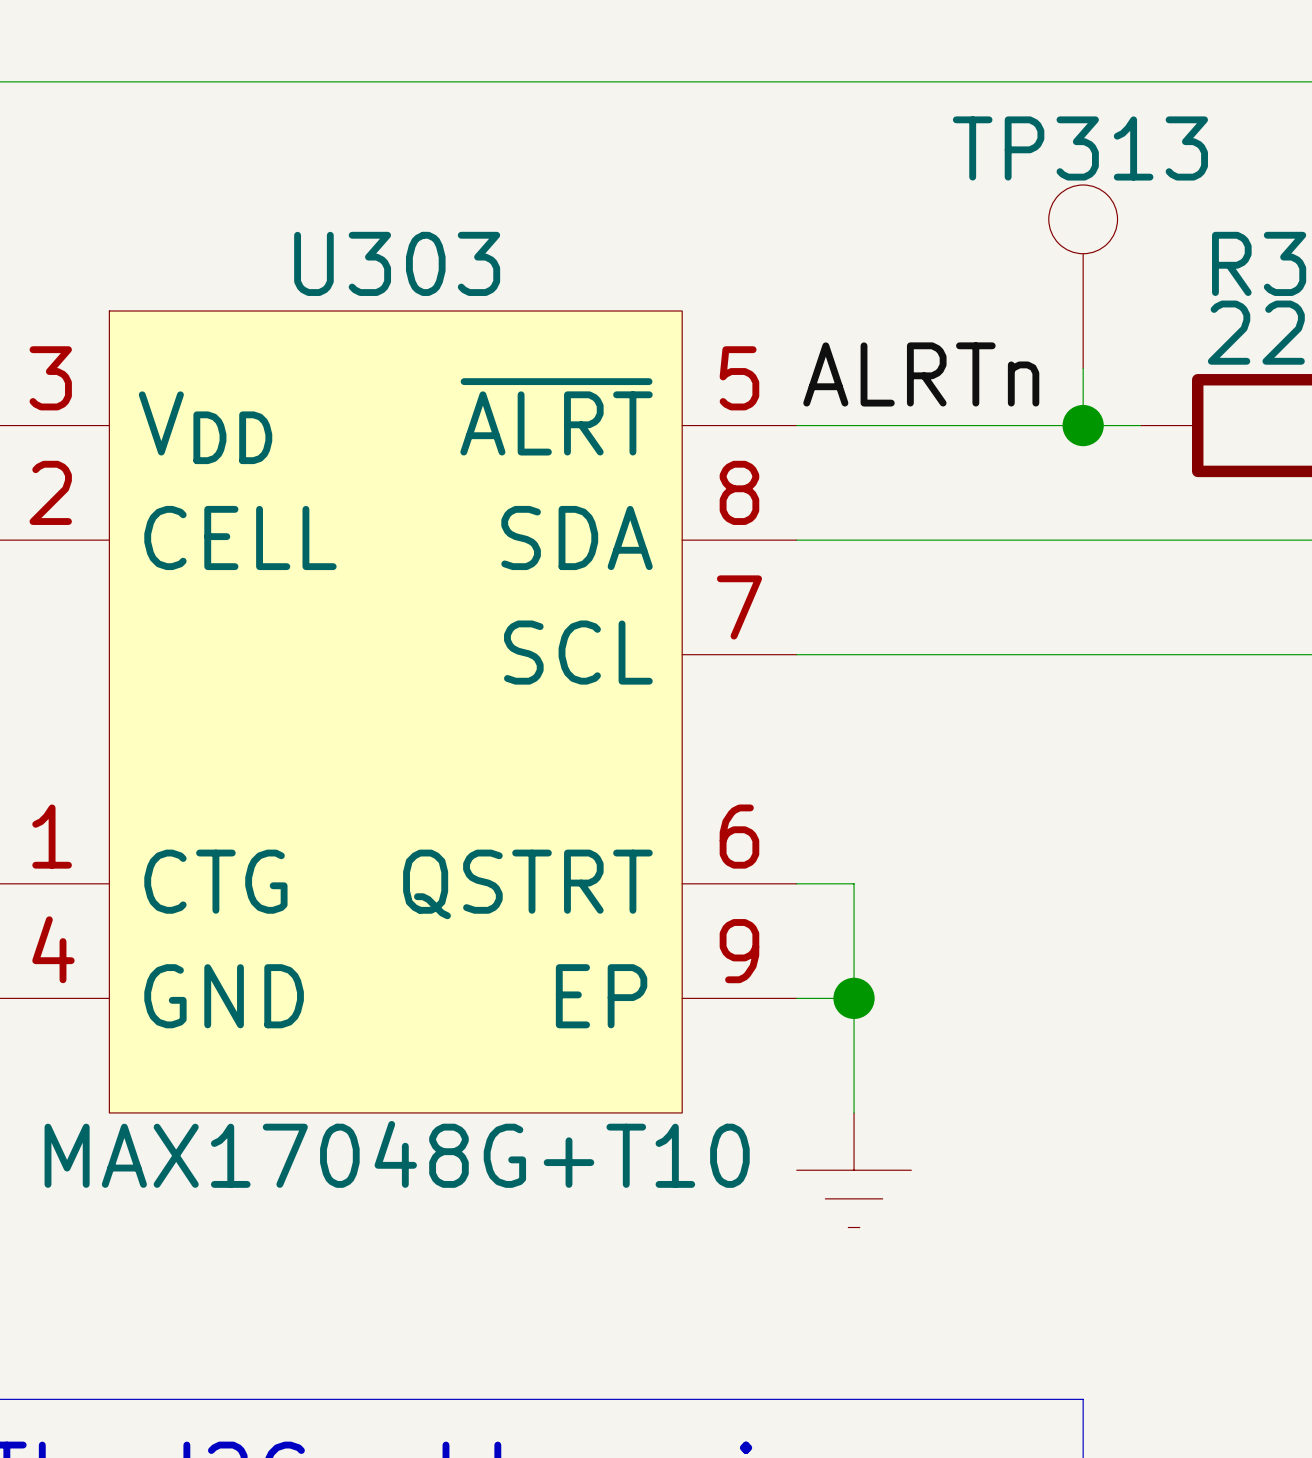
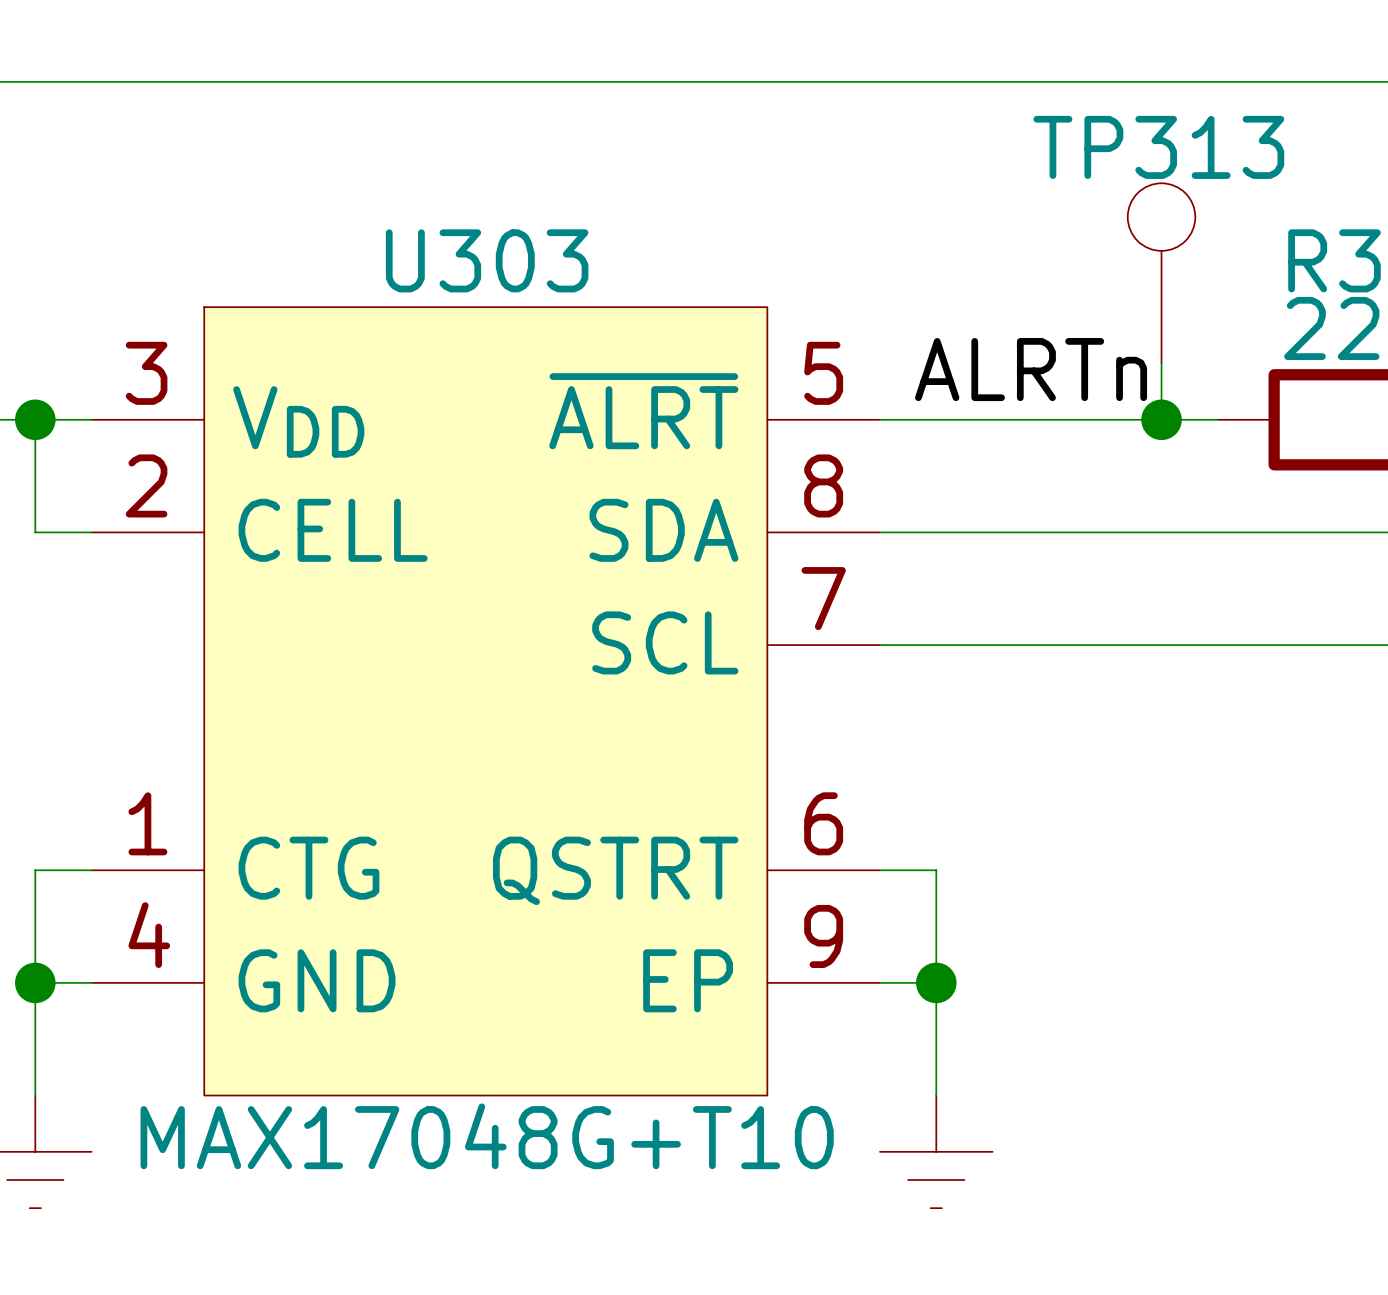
label position: ALRTn (921, 374) -> ALRTn (1031, 369)

